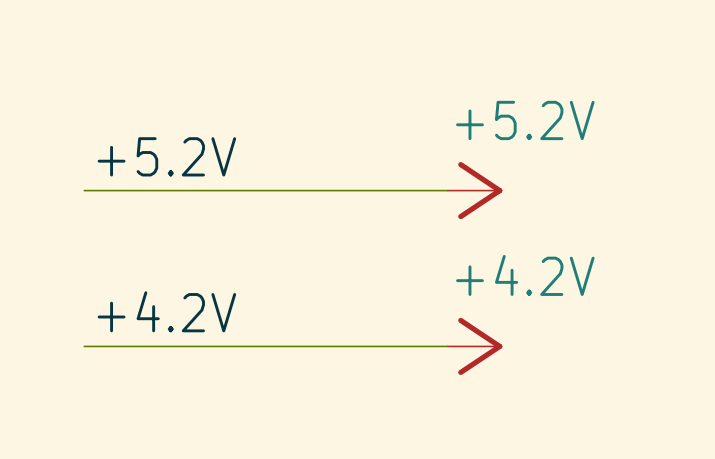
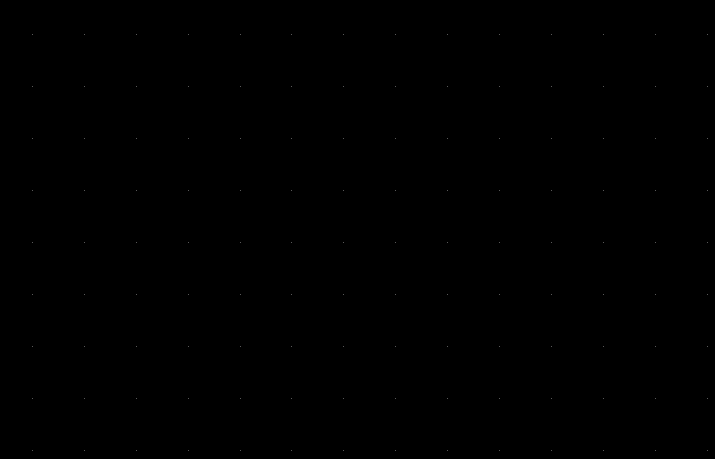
label: +5.2V (166, 156) -> none
wire: (84, 190) (447, 190) -> none
power symbol: +5.2V (475, 190) -> none
label: +4.2V (166, 311) -> none
wire: (84, 346) (447, 346) -> none
power symbol: +4.2V (475, 346) -> none

